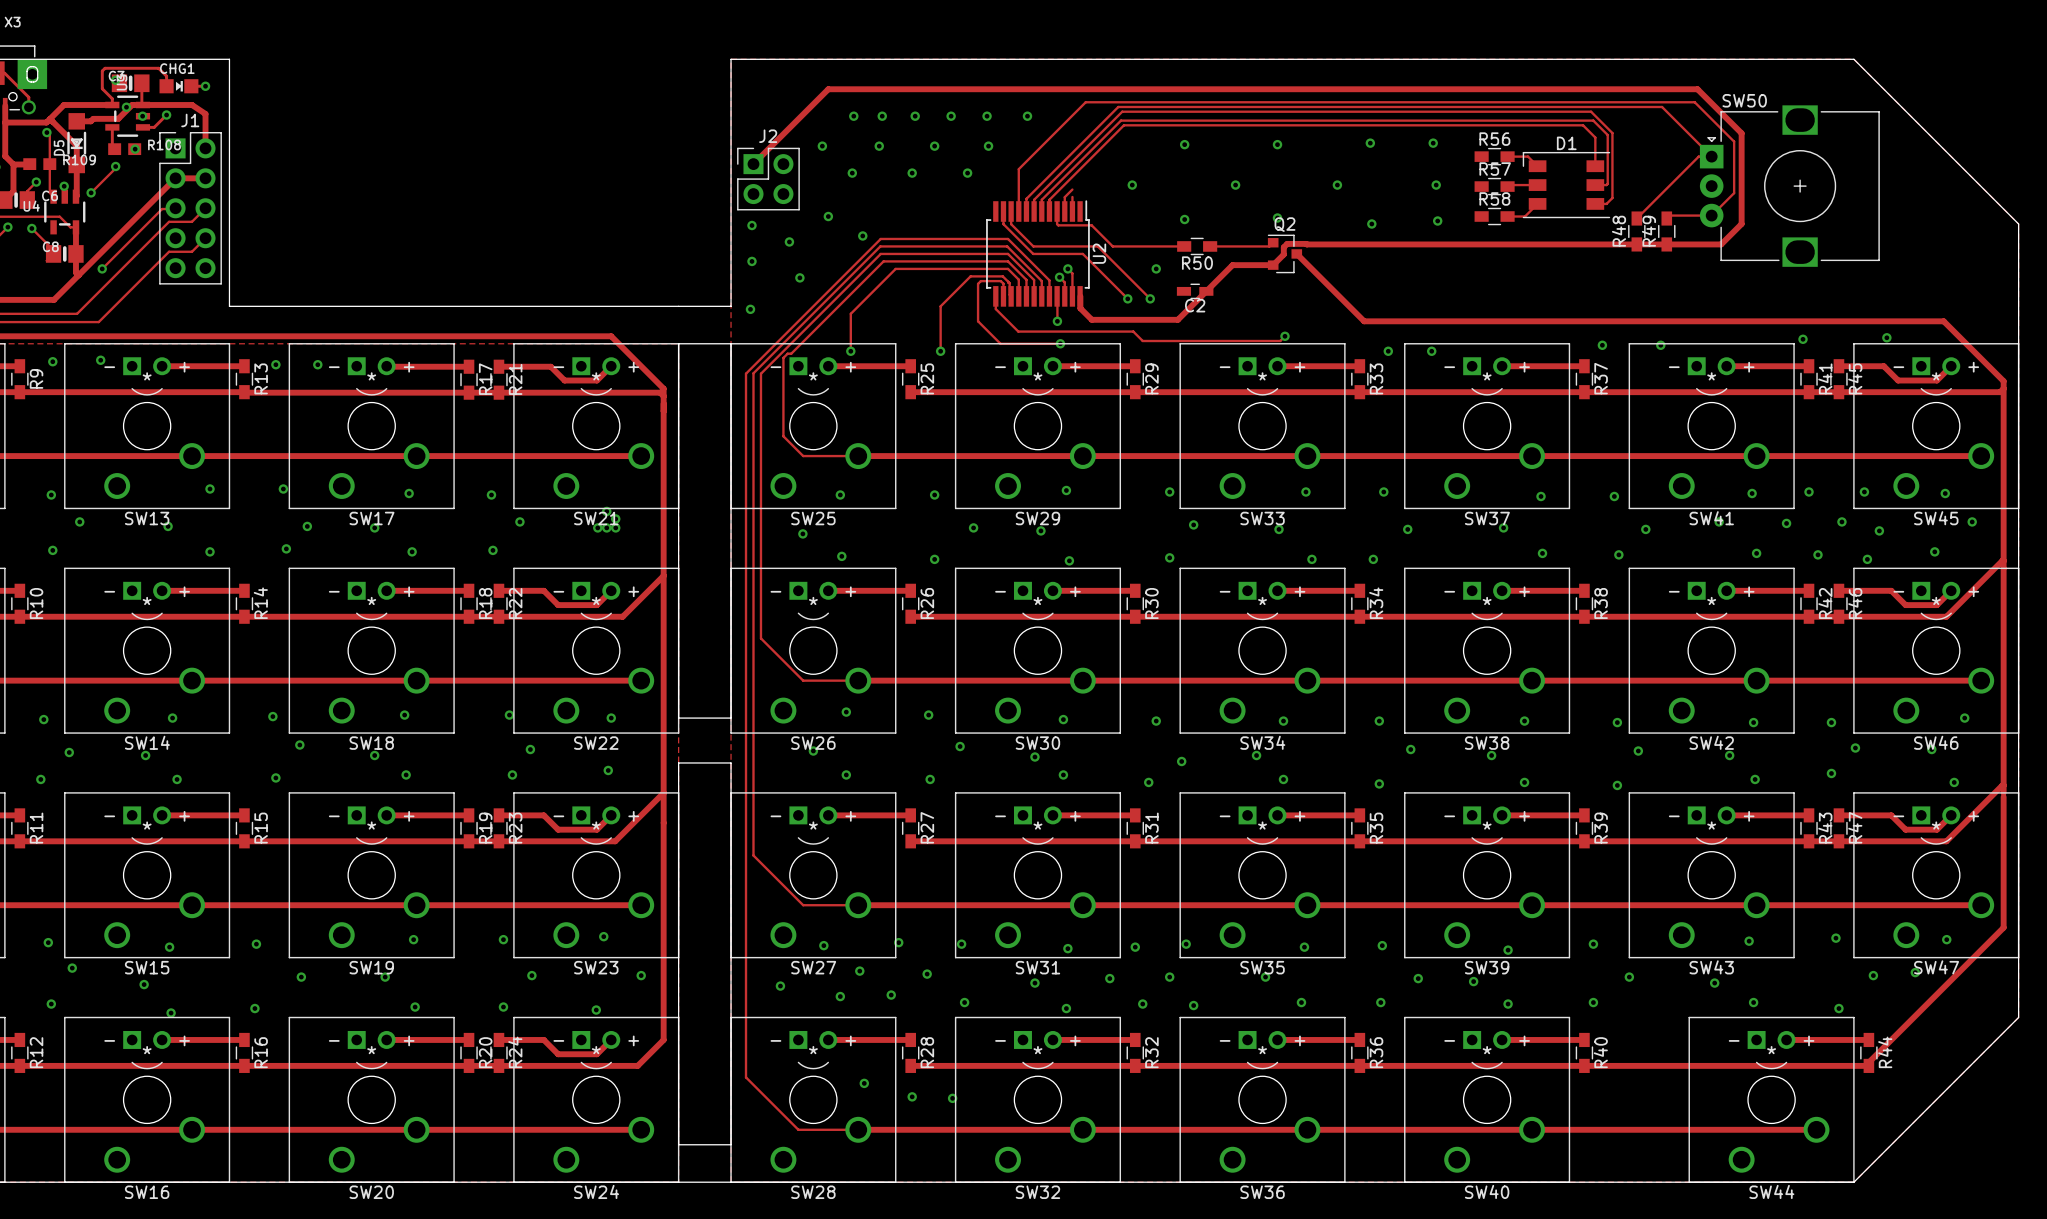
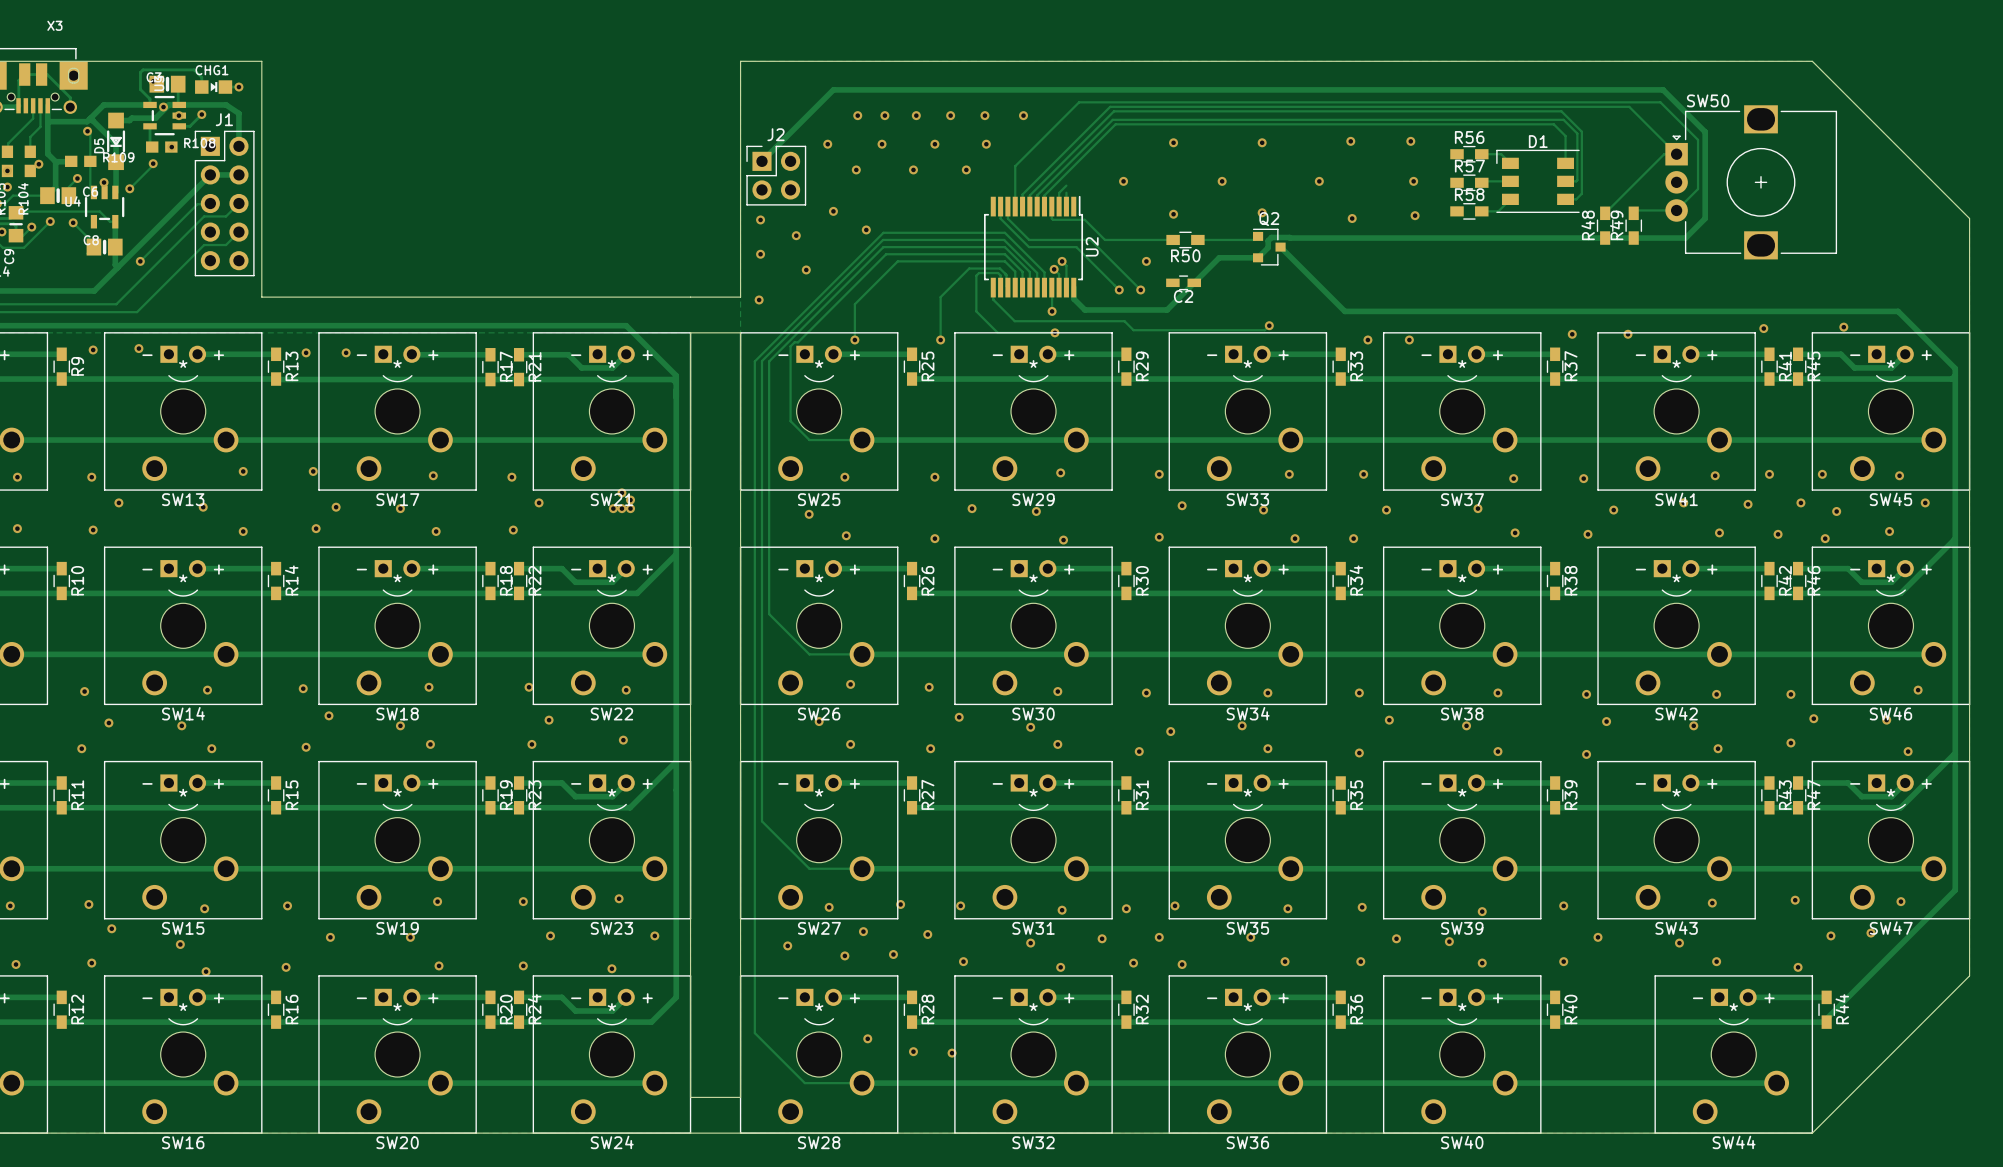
board edge: (678, 718) (731, 718) -> (690, 690) (690, 732)
board edge: (678, 762) (731, 762) -> (740, 690) (740, 732)

